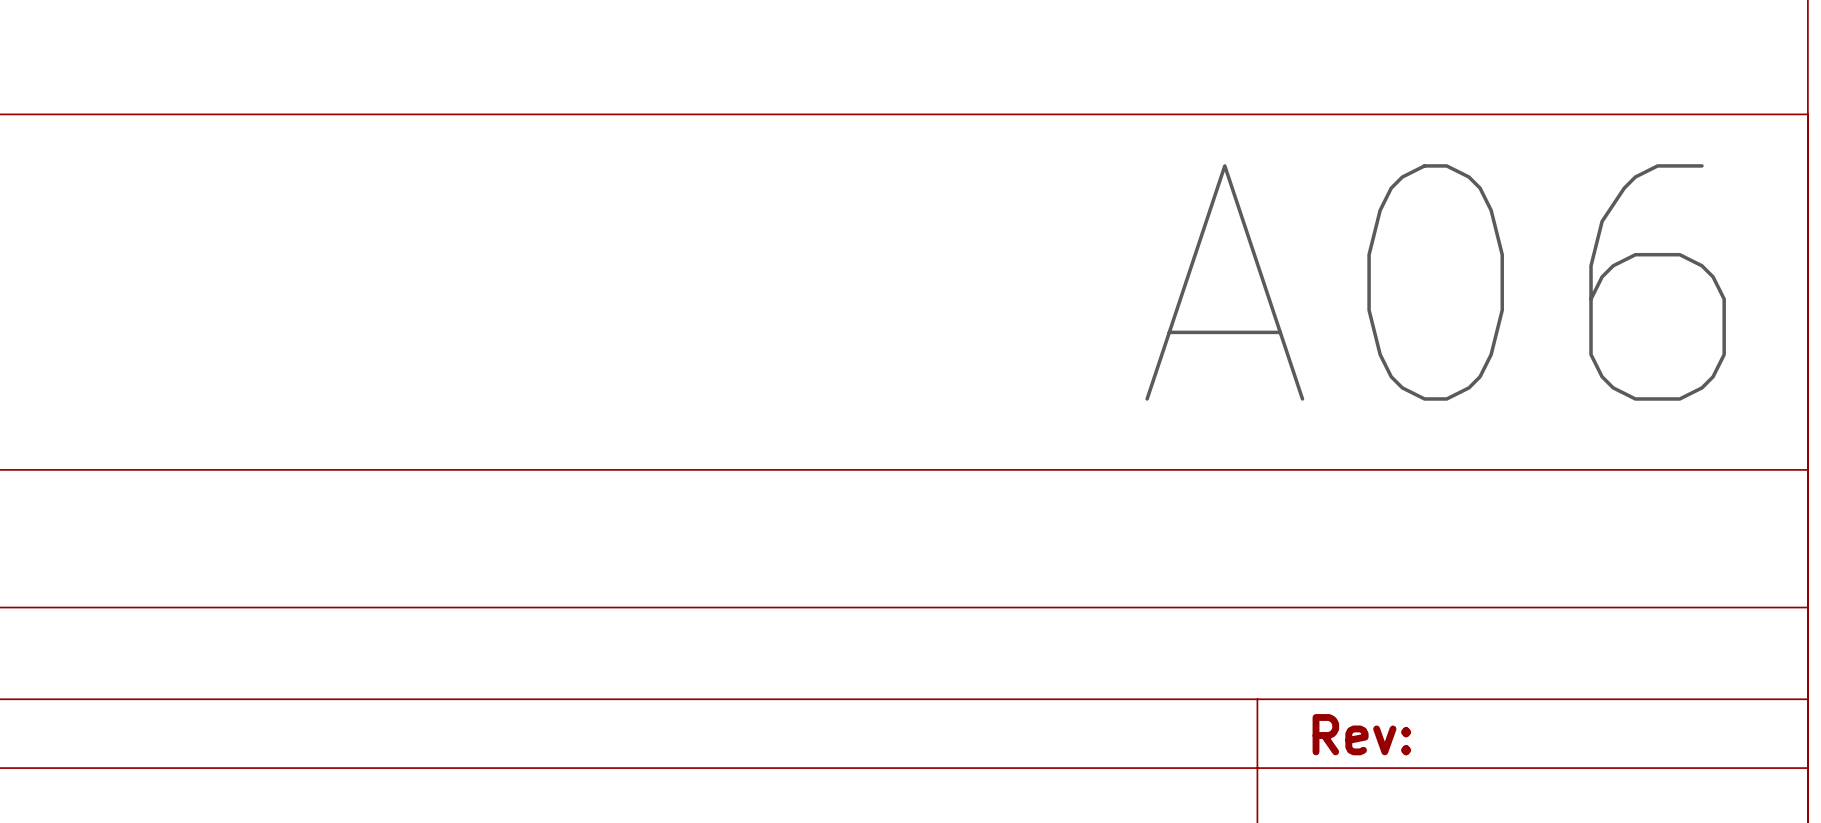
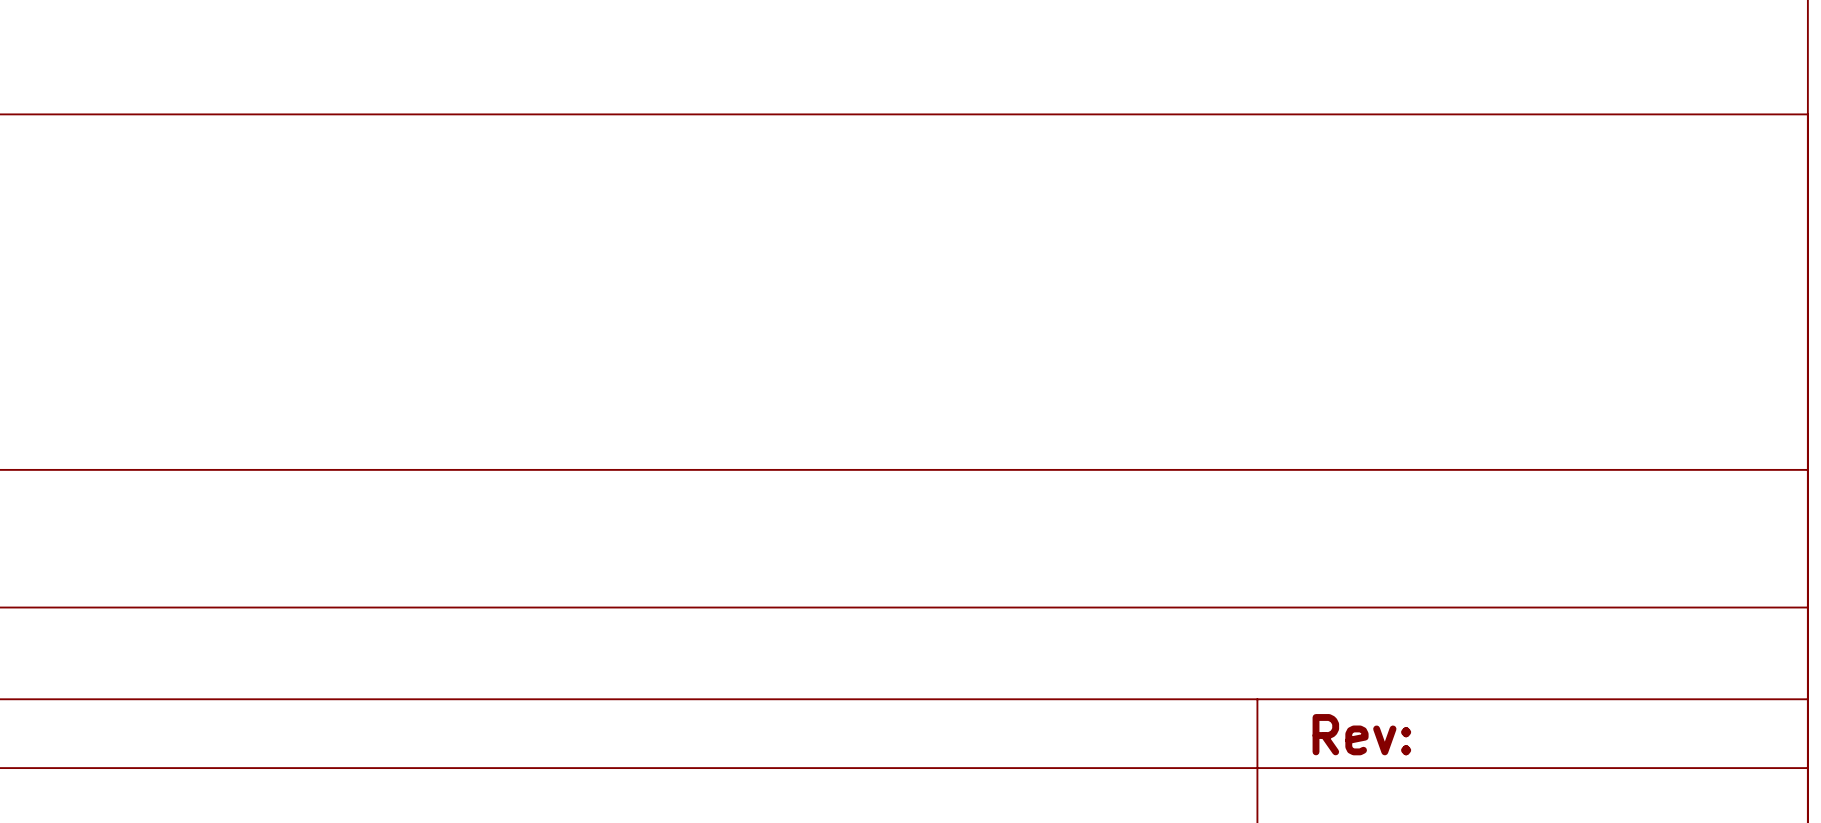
text: A06 (1435, 282) -> none

